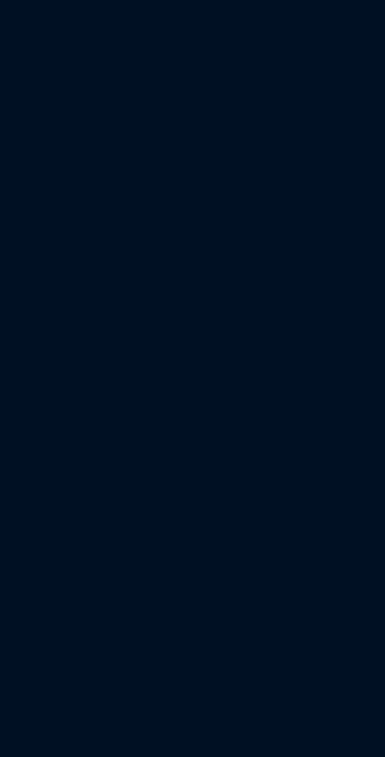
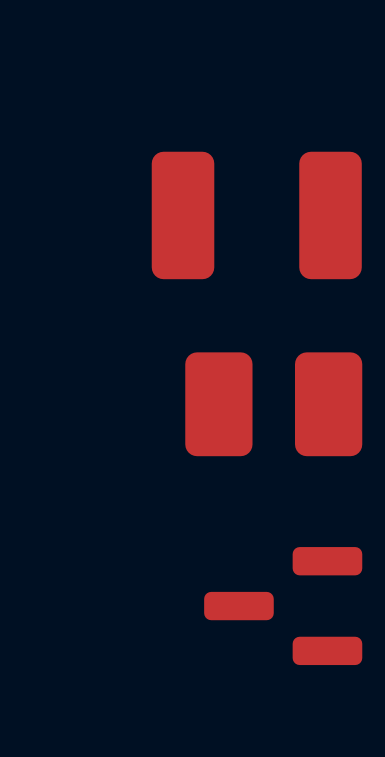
part: none -> (256, 215)
part: none -> (273, 404)
part: none -> (283, 606)

